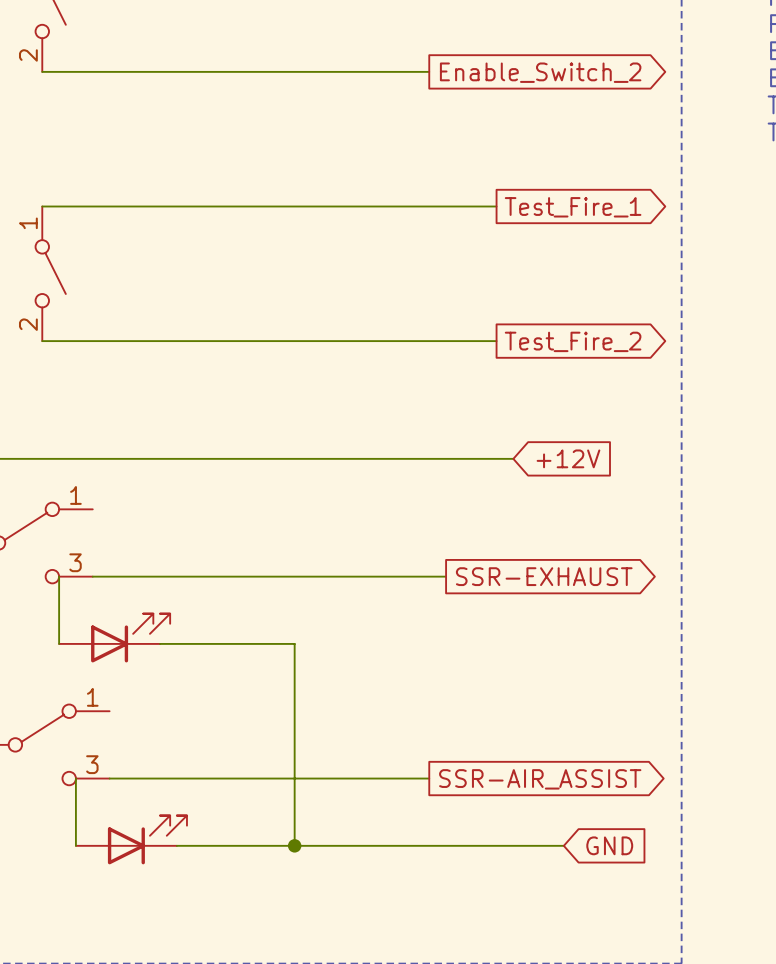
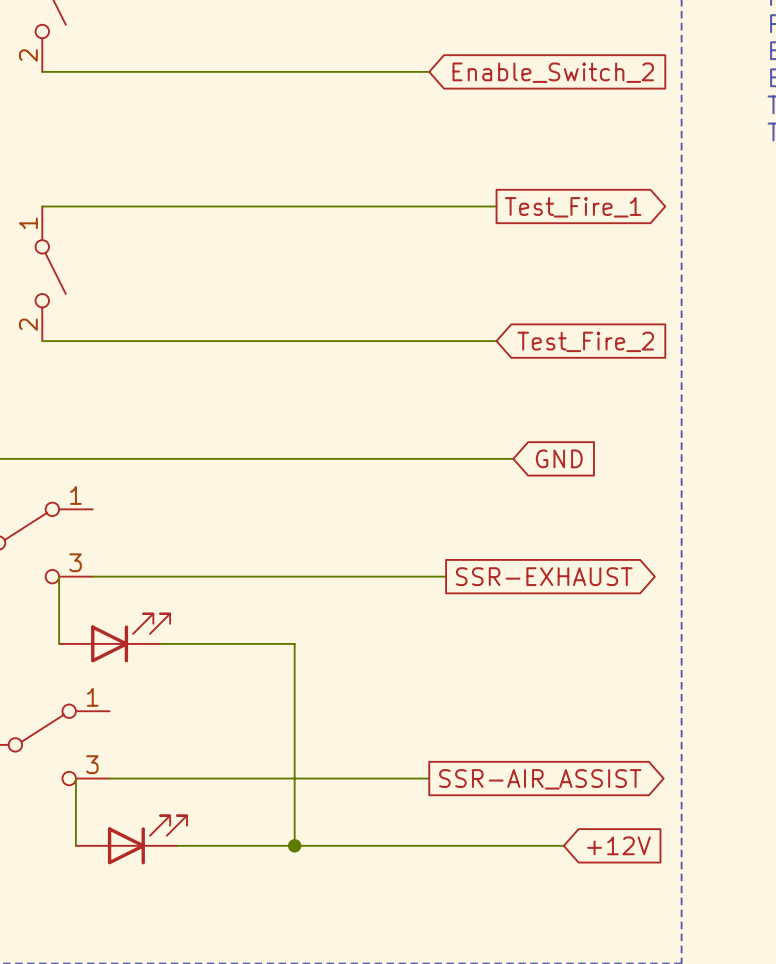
global label shape: output (540, 72) -> input (553, 72)
global label shape: output (573, 341) -> input (585, 341)
global label: +12V (568, 458) -> GND (559, 458)
global label: GND (609, 845) -> +12V (618, 845)

